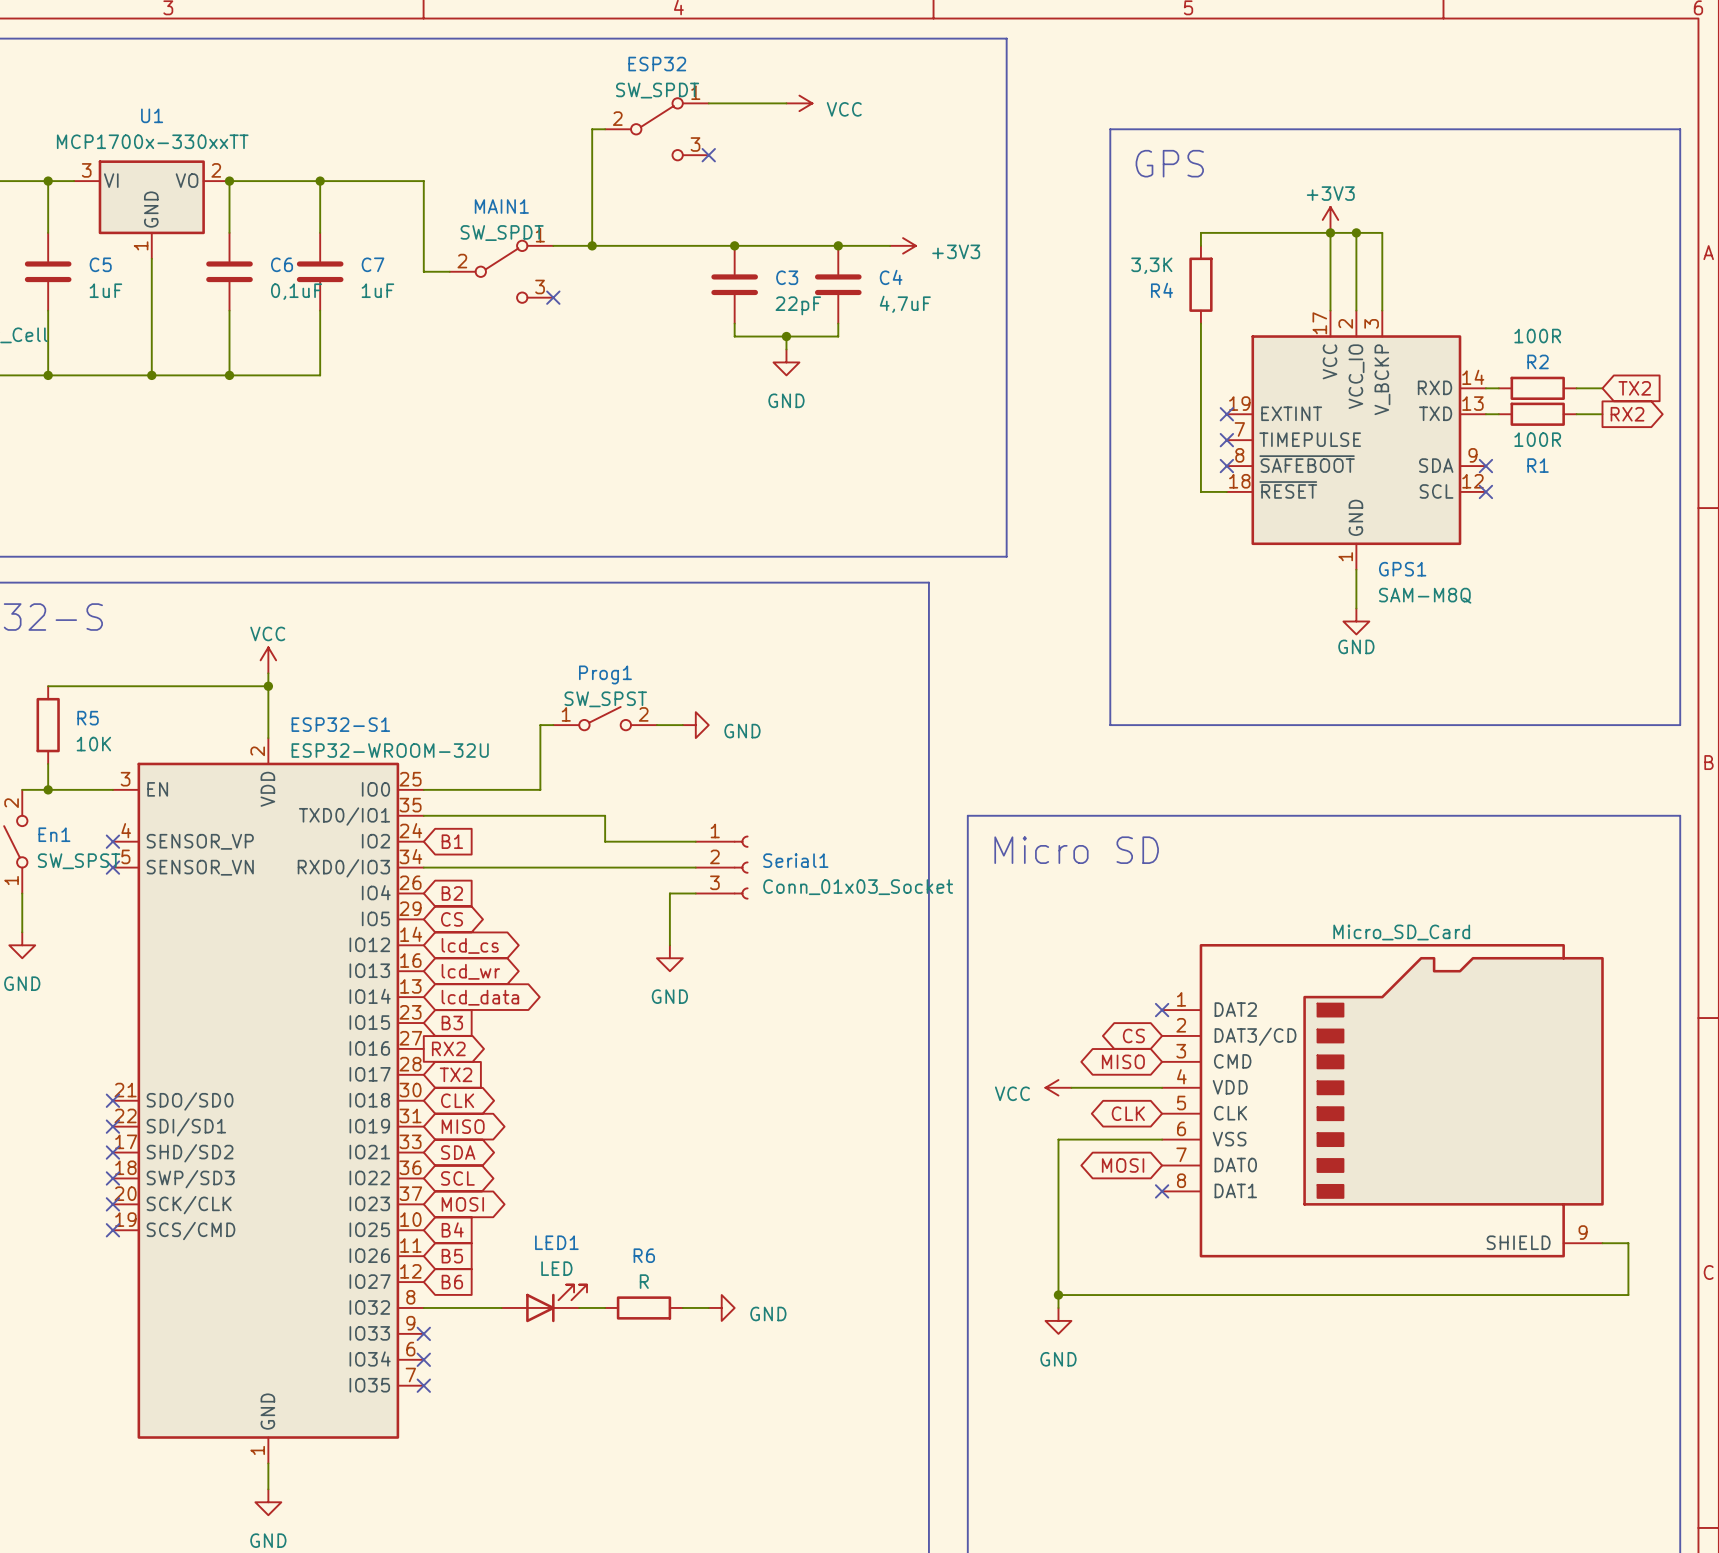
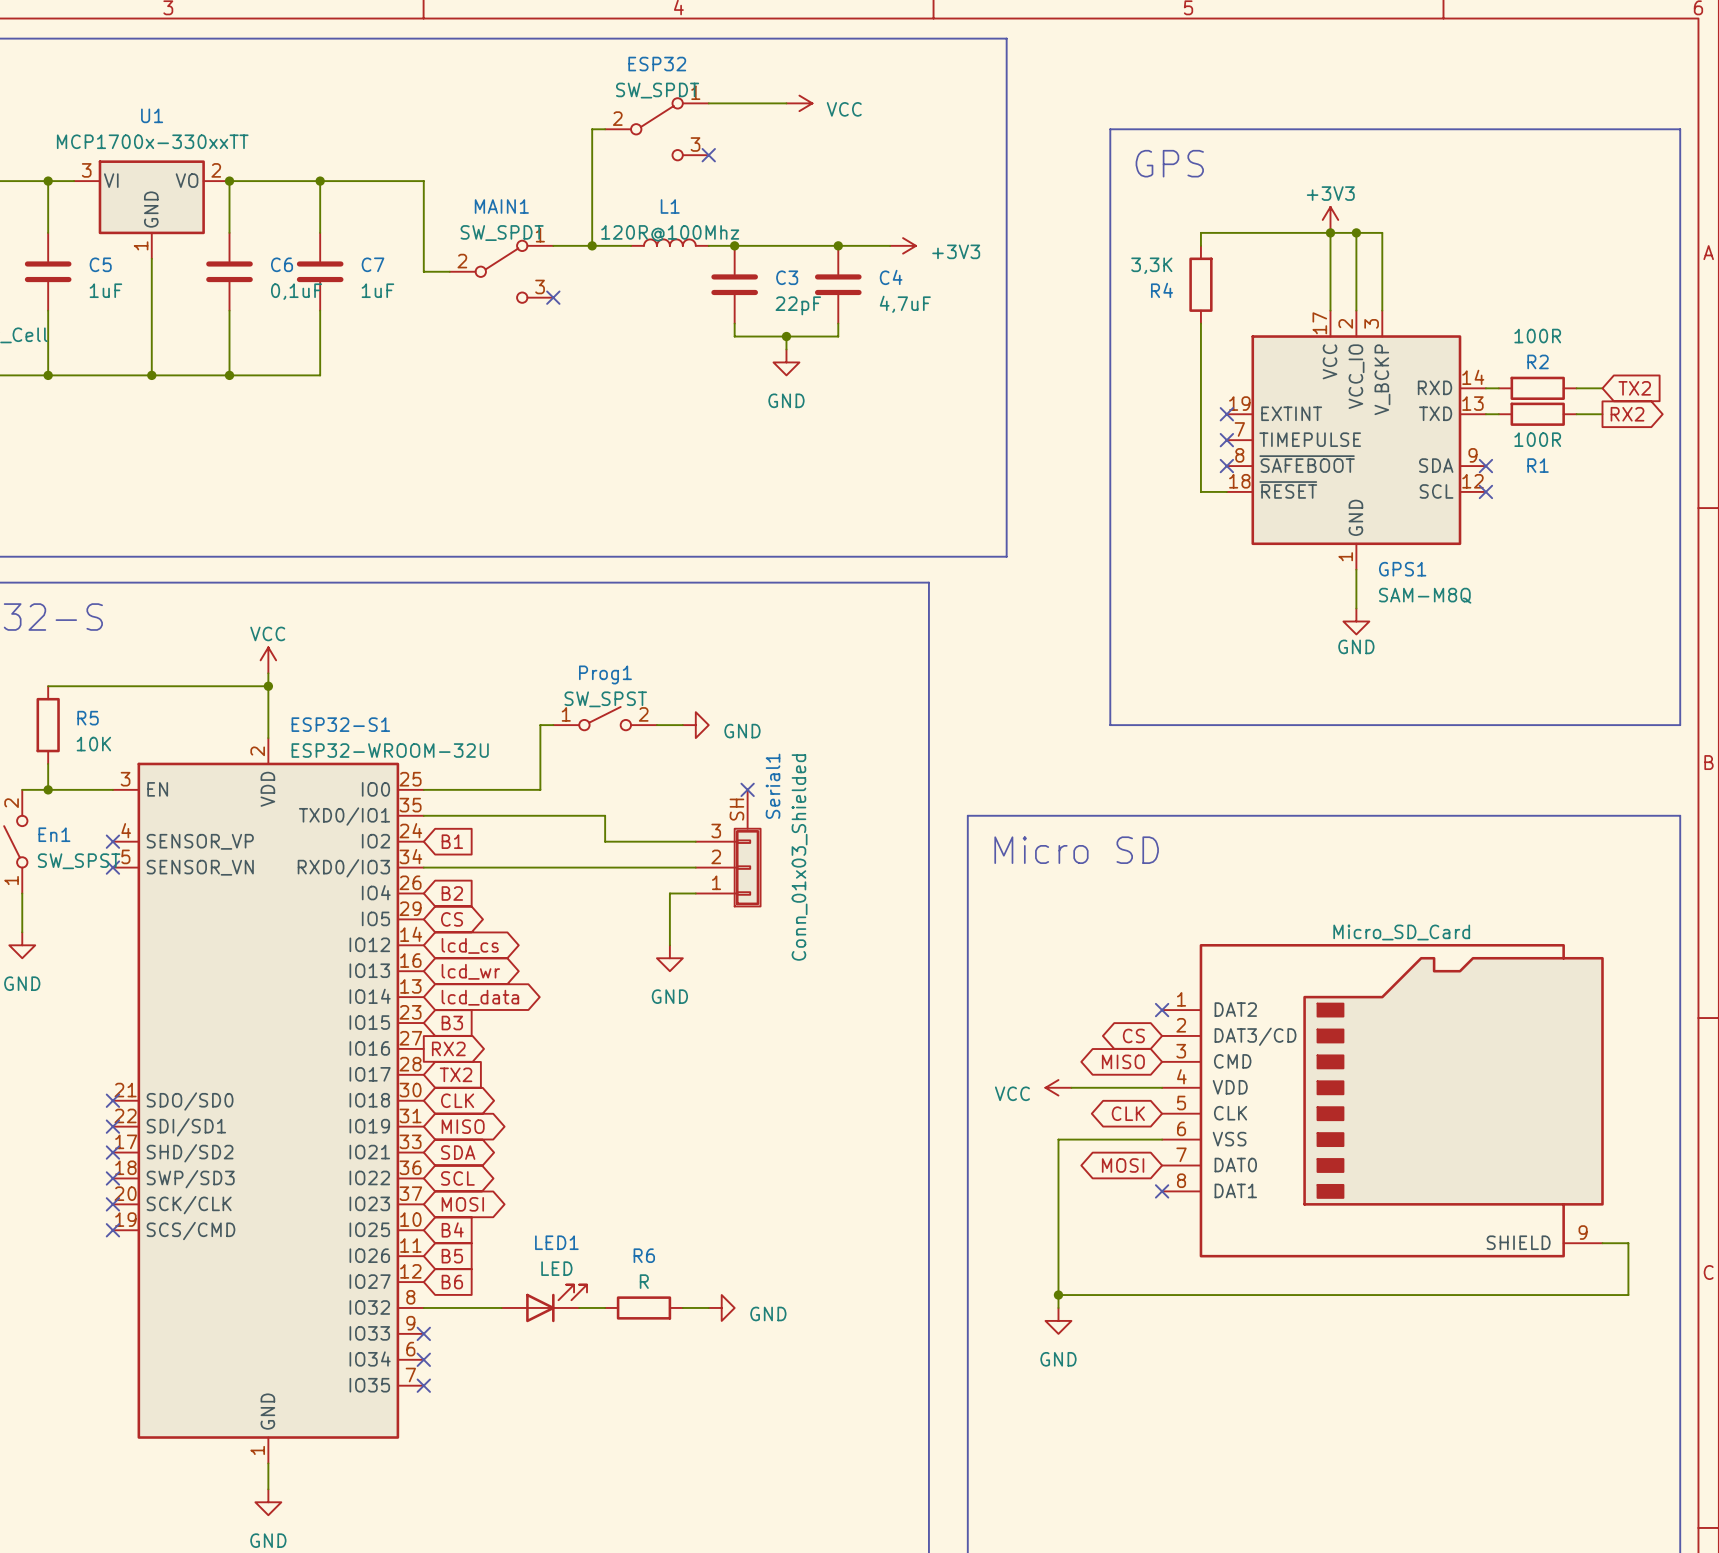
L1: none -> 120R@100Mhz (669, 242)
wire: (631, 245) (708, 245) -> none
no-connect mark: none -> (747, 789)
Serial1 symbol: [695, 835, 749, 900] -> [695, 789, 762, 908]
Serial1 name position: Serial1 (795, 860) -> Serial1 (773, 786)
Serial1 value: Conn_01x03_Socket (858, 887) -> Conn_01x03_Shielded (799, 857)

